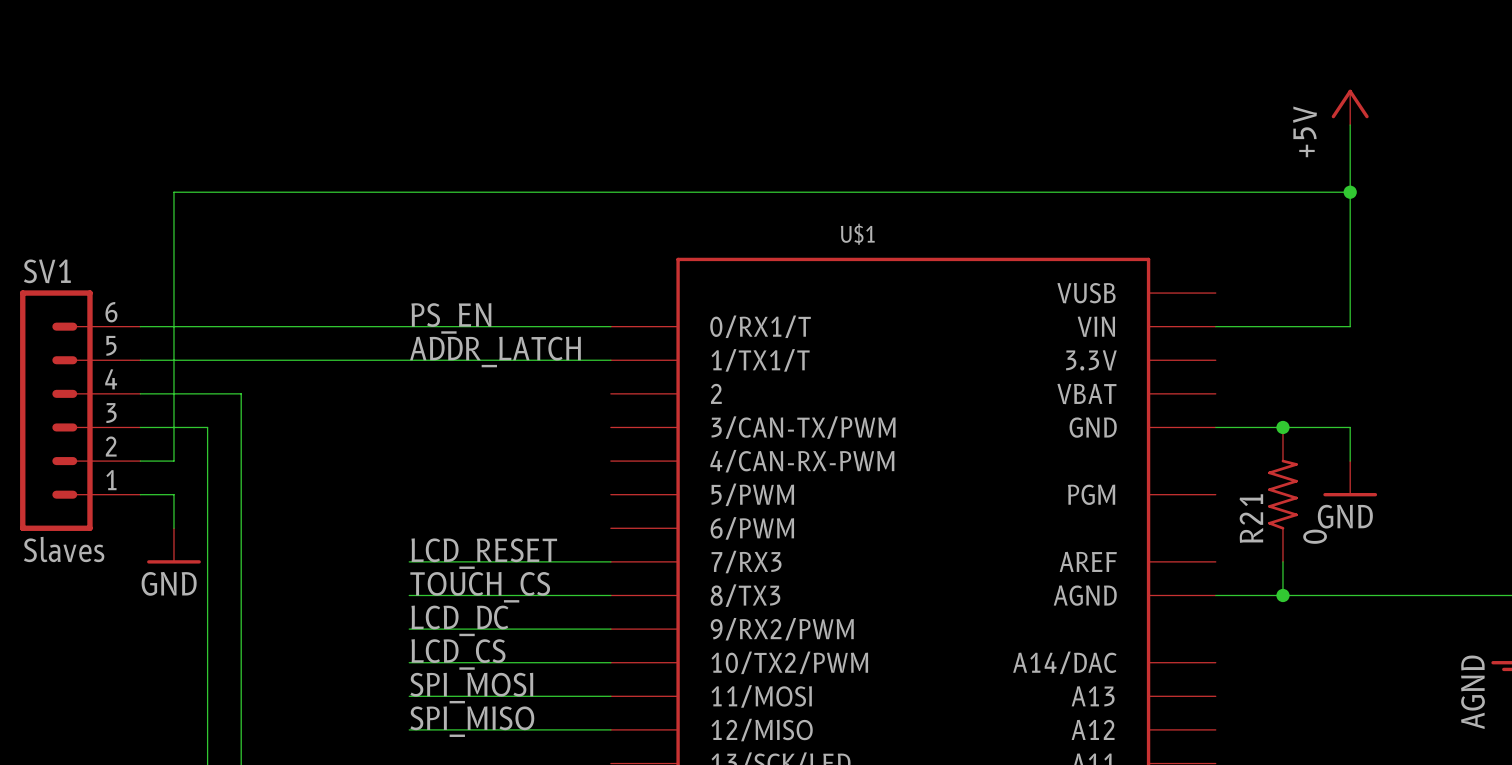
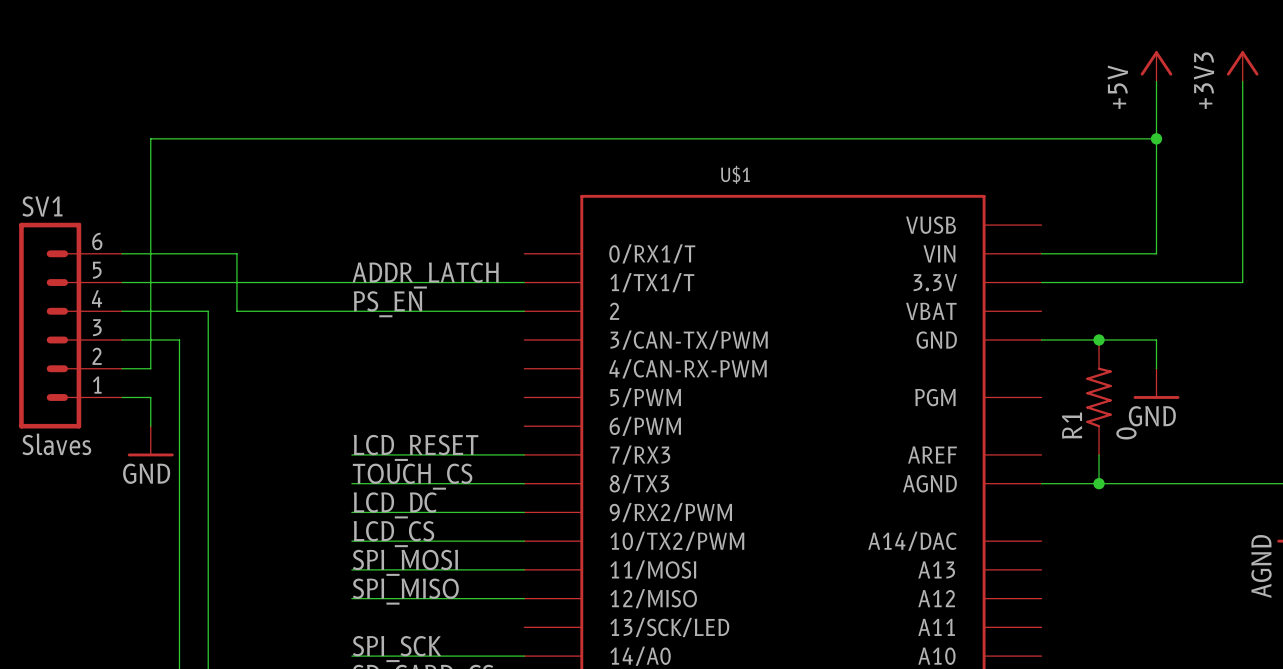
power symbol: none -> +3V3 (1242, 66)
wire: none -> (1242, 81) (1242, 282) (1041, 282)
label position: PS_EN (451, 318) -> PS_EN (387, 304)
wire: (274, 326) (610, 326) -> (236, 253) (236, 311) (524, 311)
R21 name: R21 (1251, 518) -> R1 (1072, 425)

